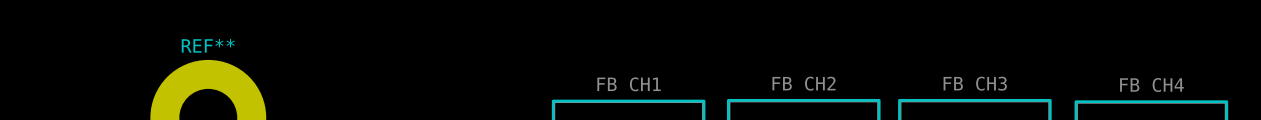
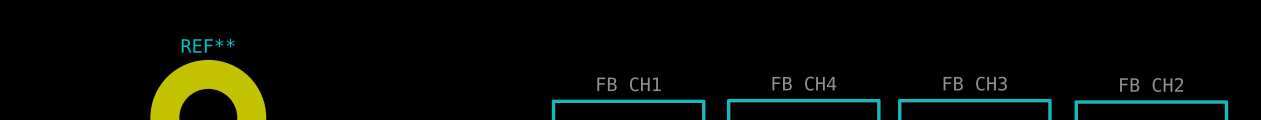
part value: FB CH2 (804, 83) -> FB CH4 (804, 83)
part value: FB CH4 (1151, 85) -> FB CH2 (1151, 85)

